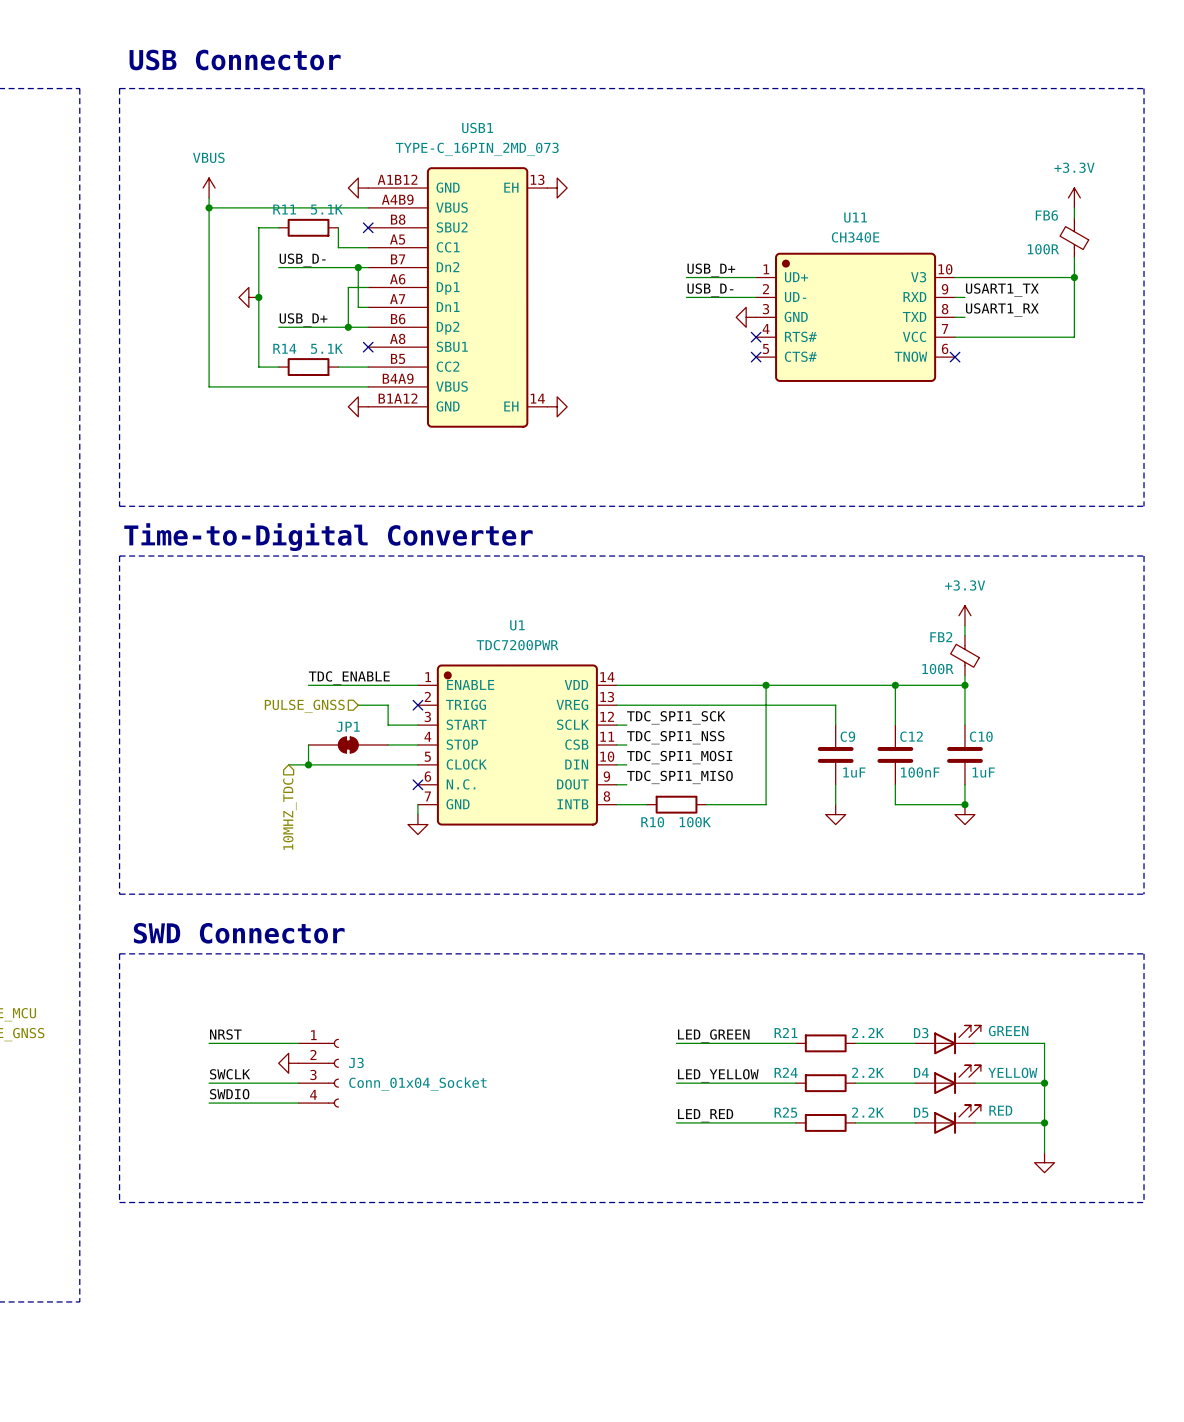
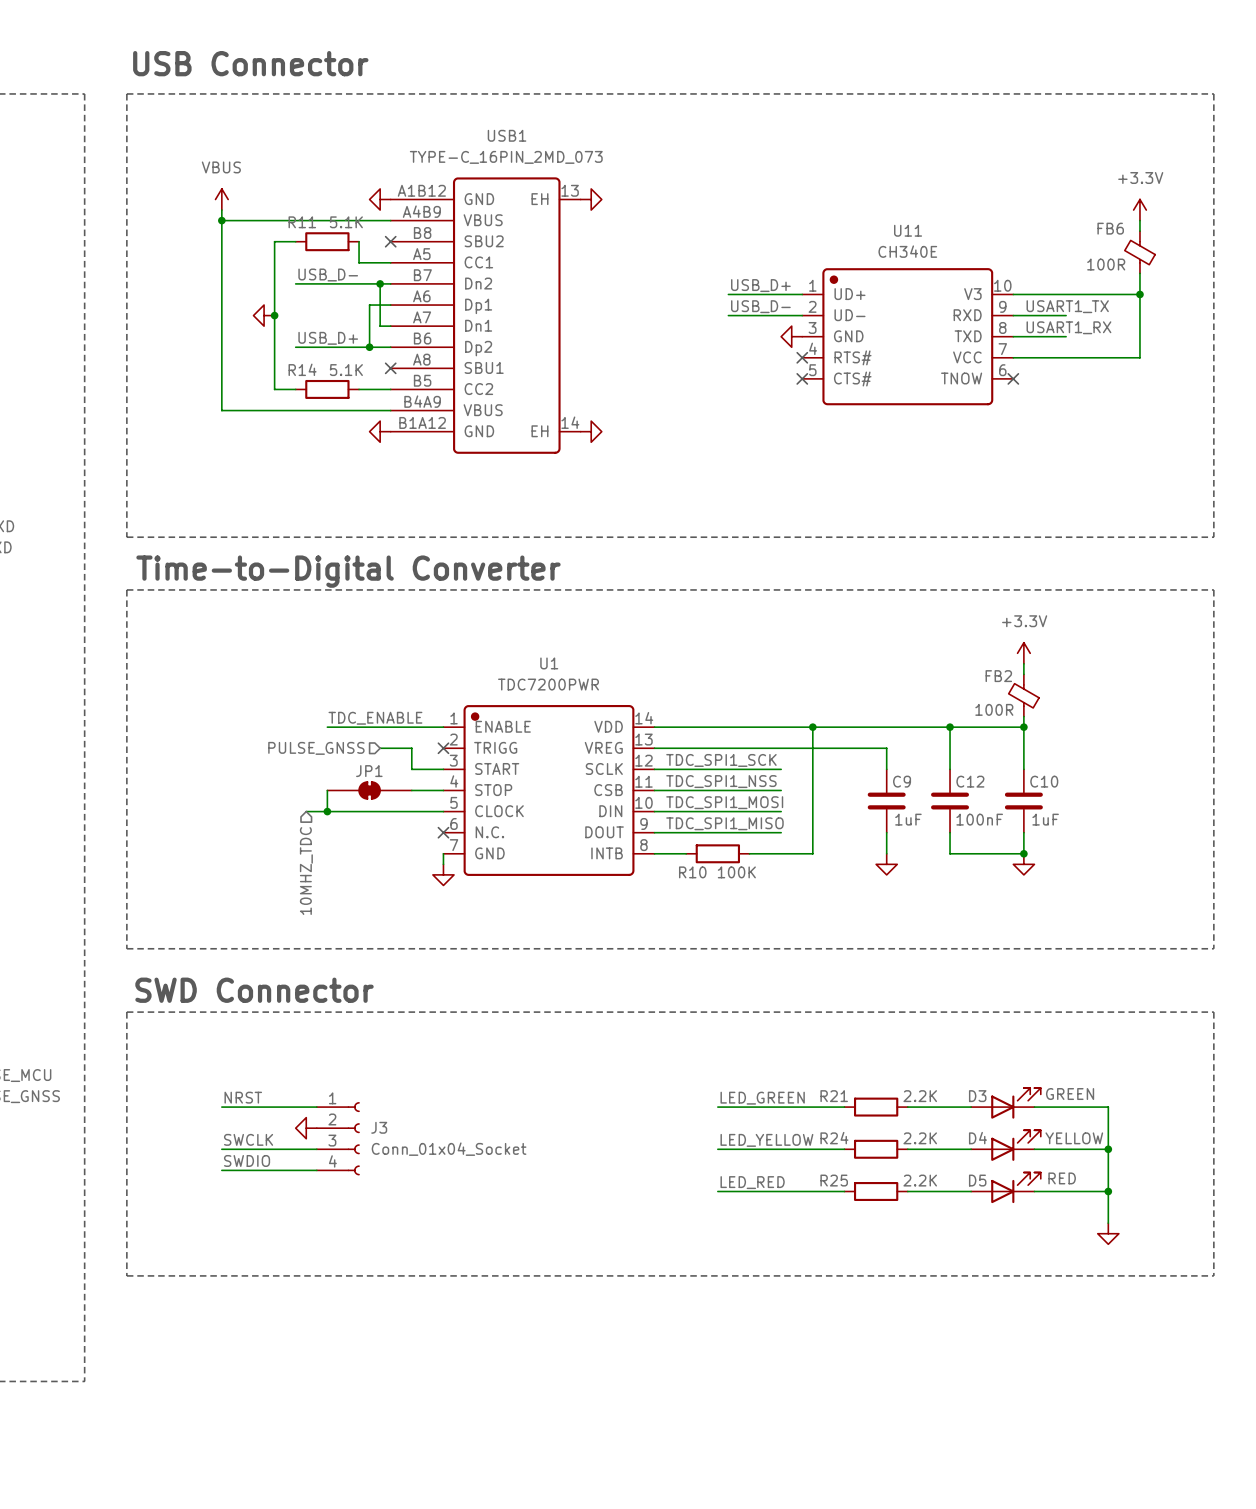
wire: none -> (1023, 315) (1066, 315)
wire: none -> (1023, 336) (1066, 336)
wire: none -> (665, 769) (781, 769)
wire: none -> (665, 790) (781, 790)
wire: none -> (665, 811) (781, 811)
wire: none -> (665, 832) (781, 832)

